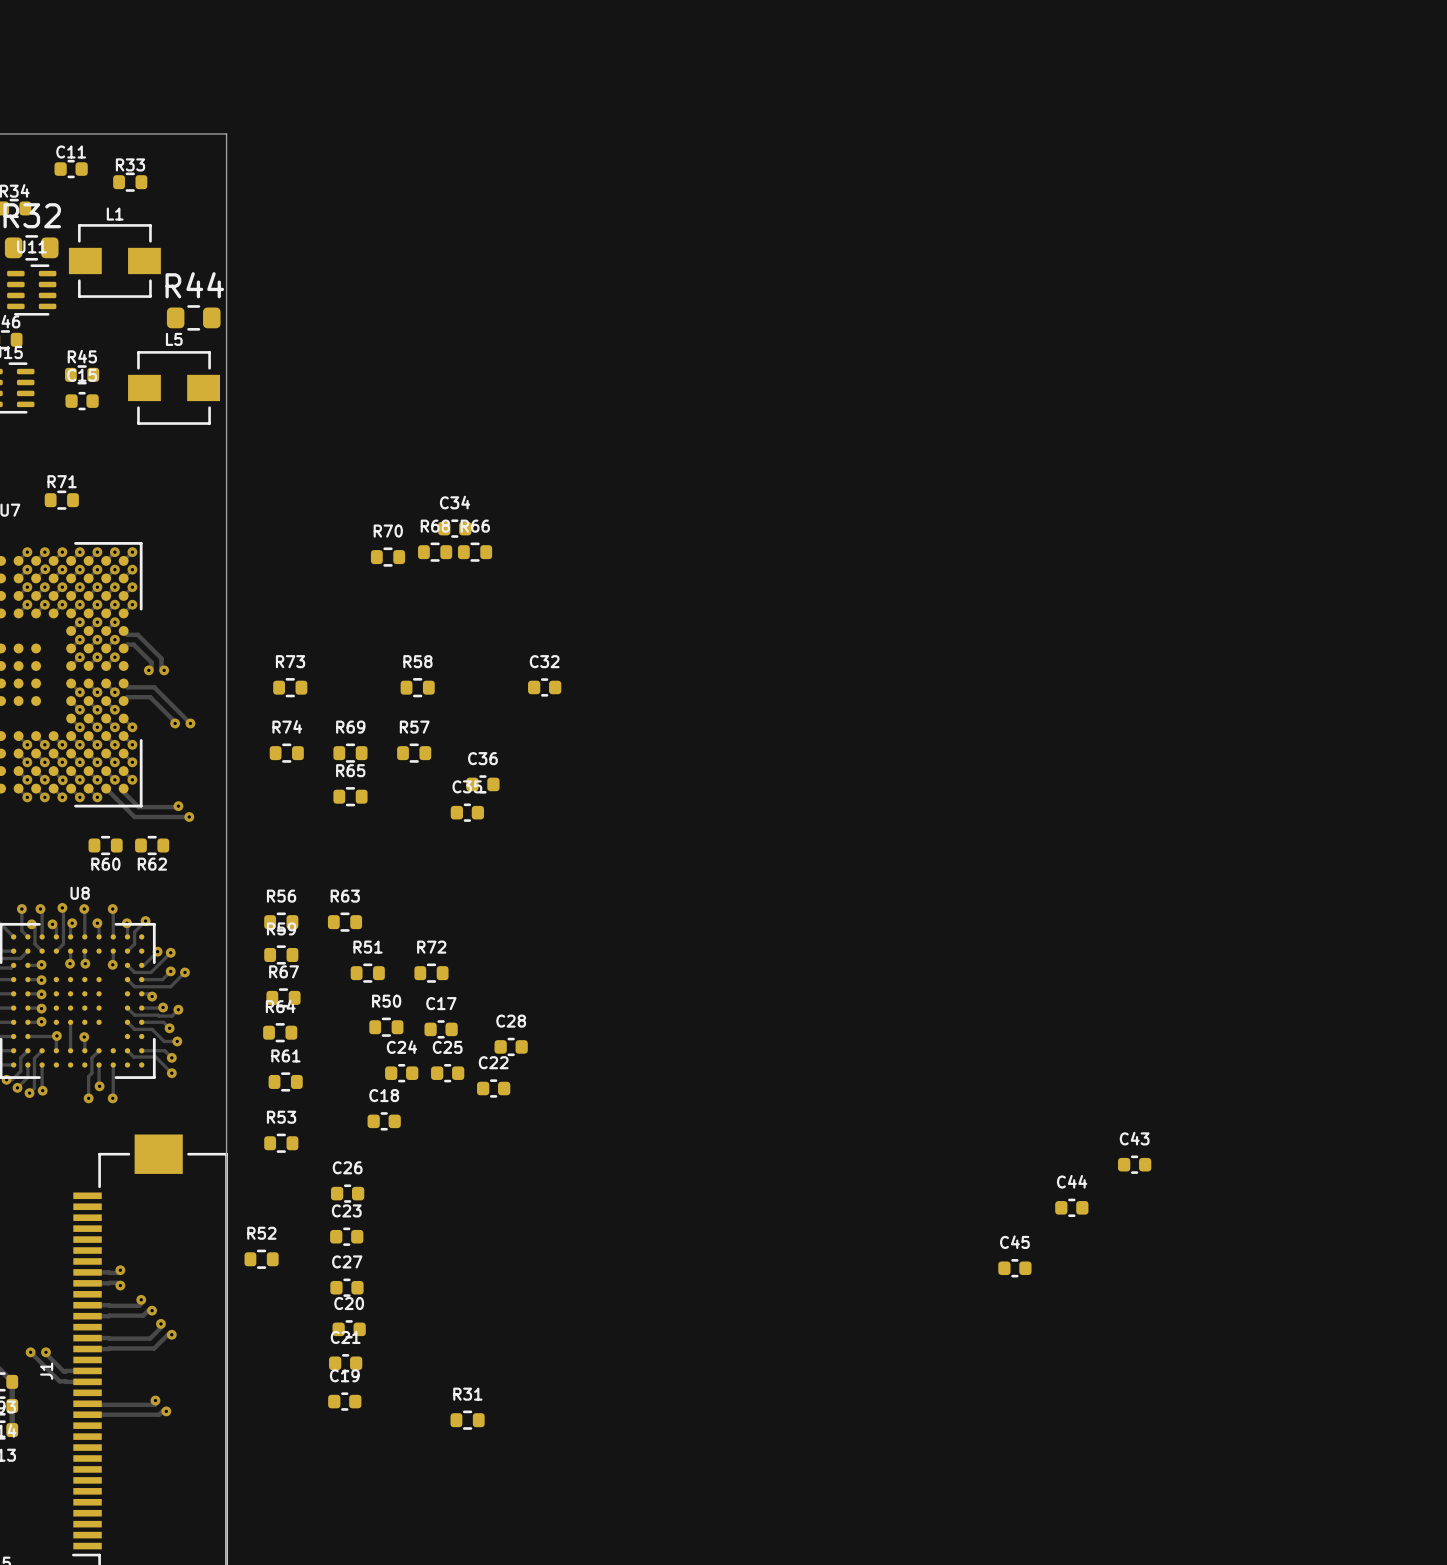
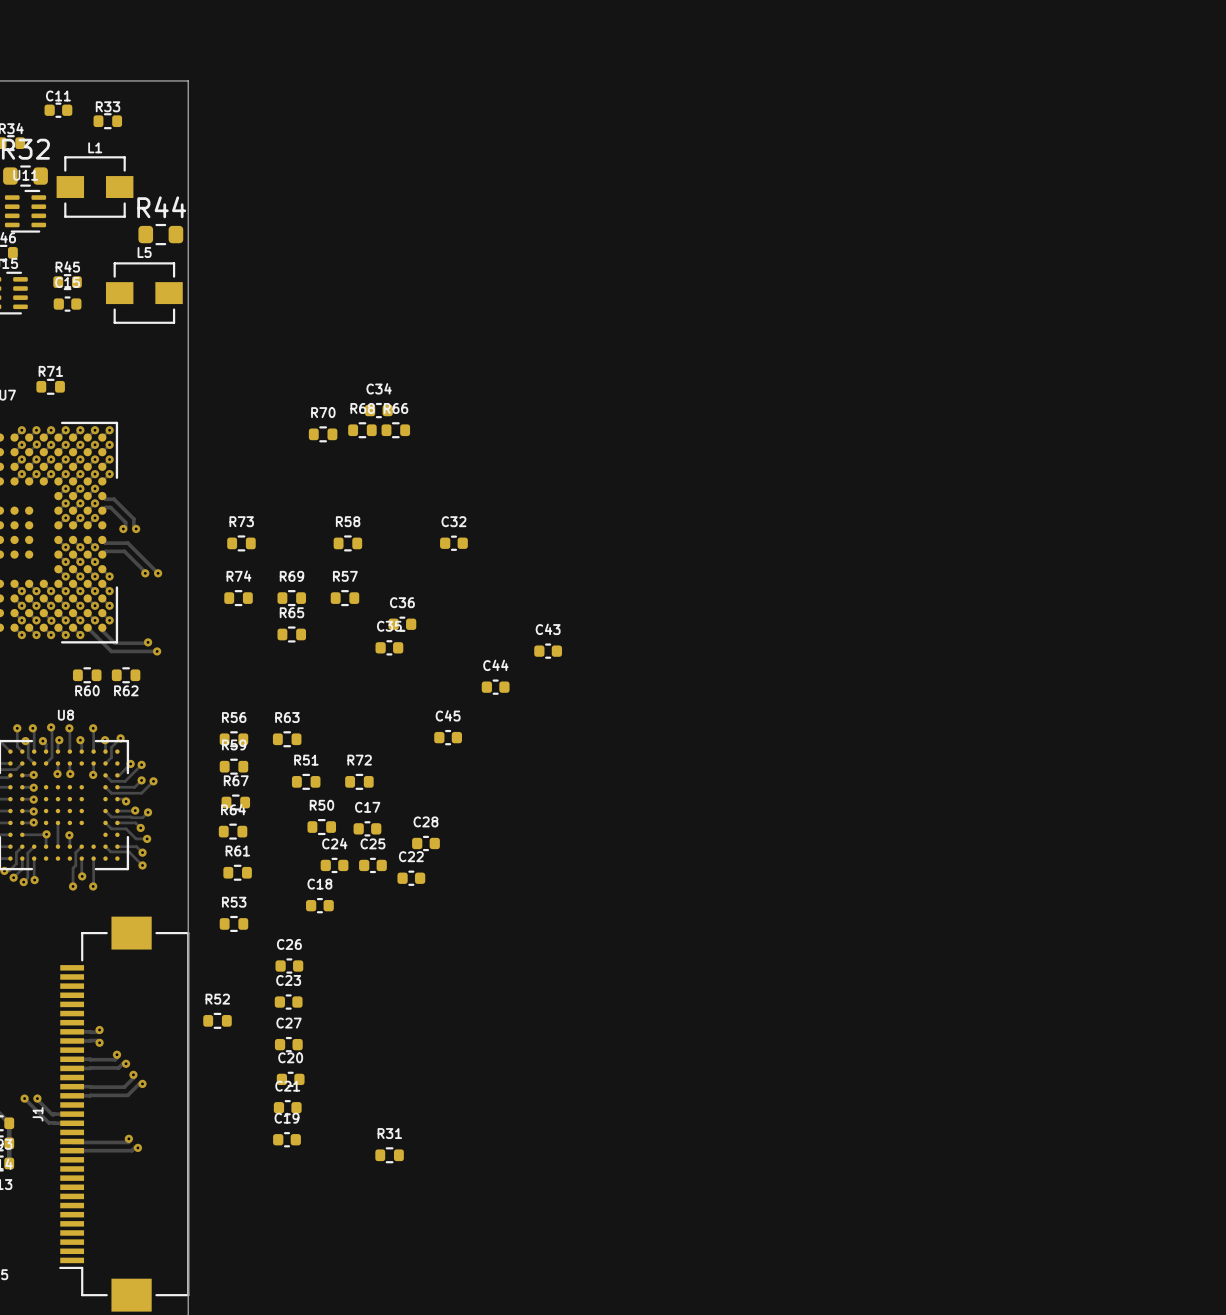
C43 position: (1134, 1164) -> (548, 651)
C44 position: (1071, 1207) -> (495, 687)
C45 position: (1014, 1268) -> (448, 737)

